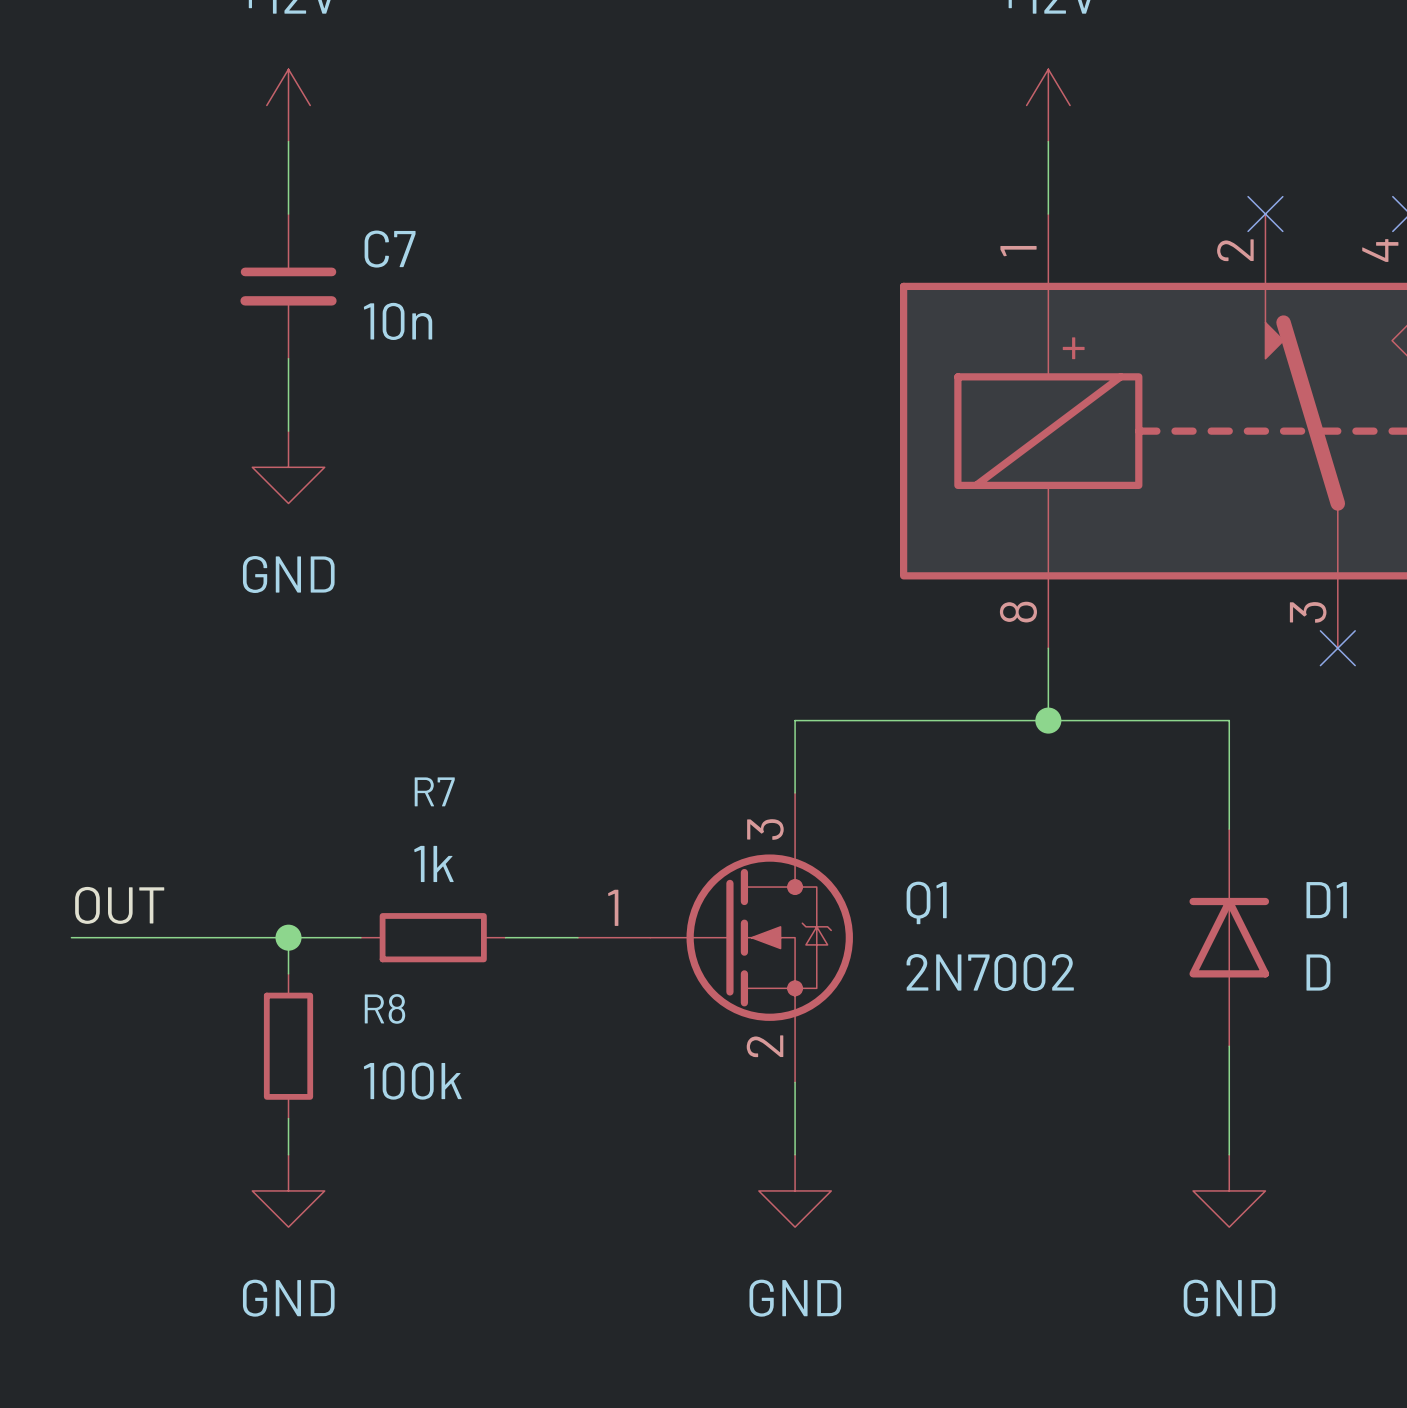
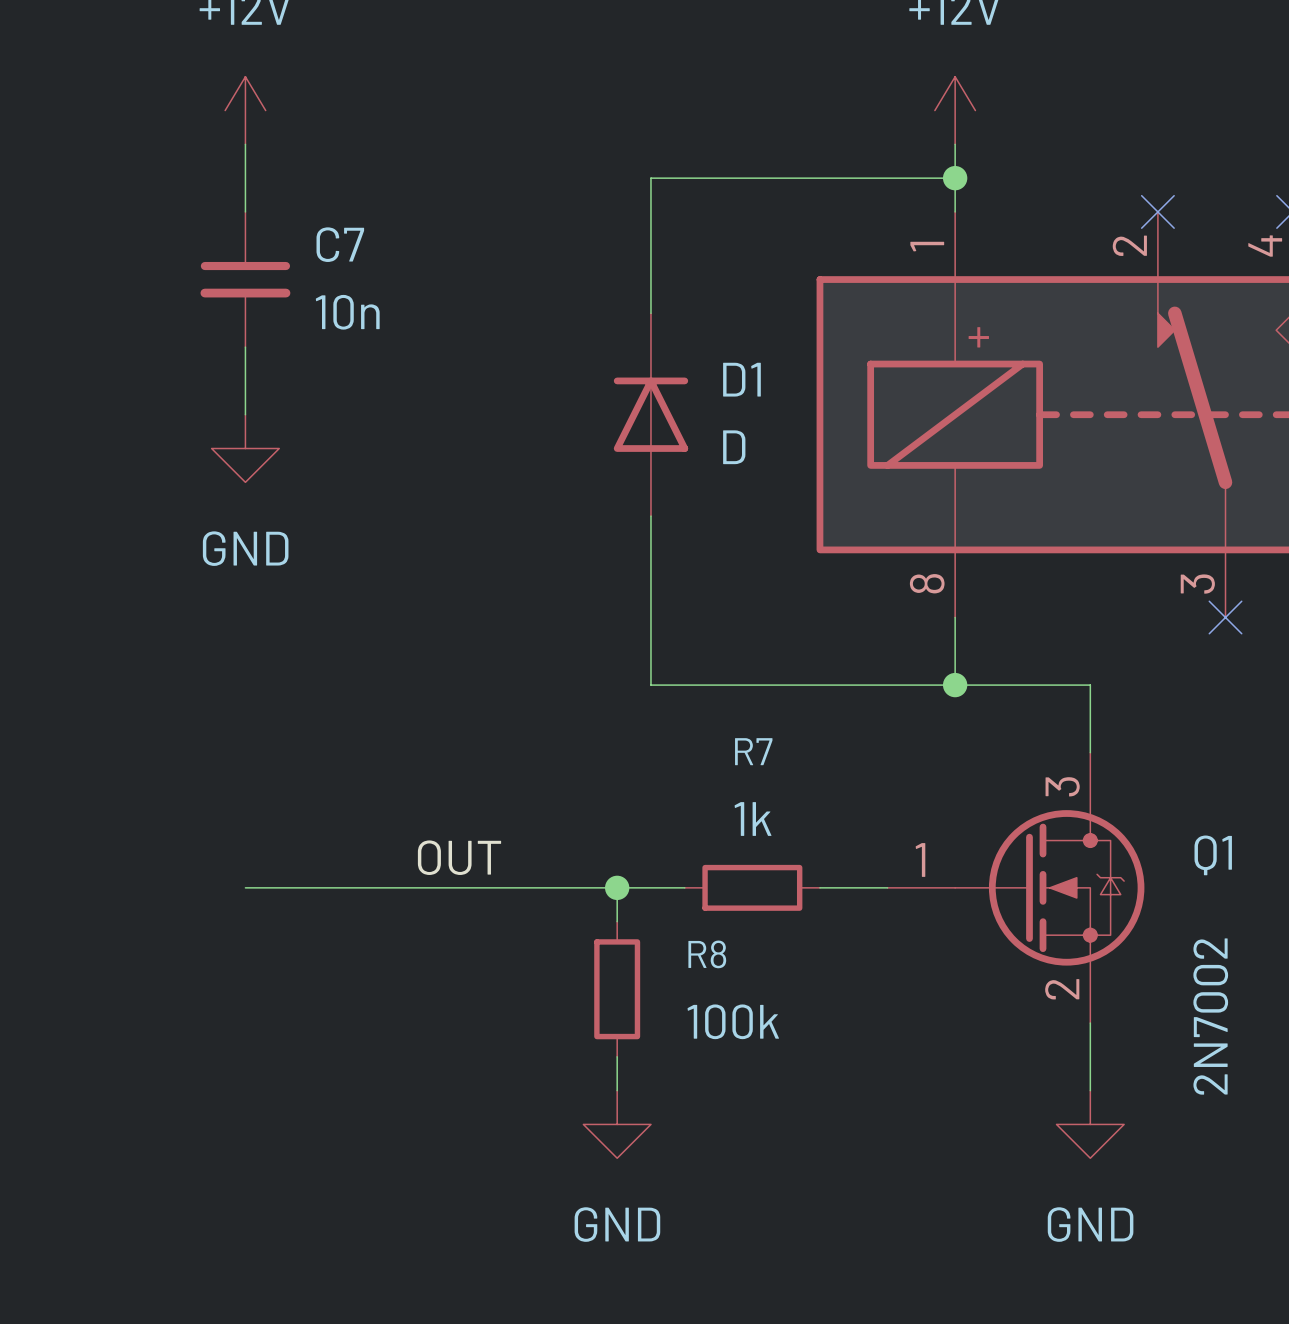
wire: none -> (955, 178) (650, 178) (650, 313)
junction: none -> (955, 178)
wire: (795, 720) (795, 792) -> (718, 685) (650, 685) (650, 516)
wire: (1193, 720) (1229, 720) (1229, 829) -> (1090, 685) (1090, 752)
label position: OUT (119, 905) -> OUT (459, 857)
wire: (71, 937) (288, 937) (288, 973) -> none
junction: (288, 937) -> none
wire: none -> (313, 887) (448, 887)
R7 position: (433, 937) -> (752, 887)
wire: none -> (617, 887) (617, 921)
junction: none -> (617, 887)
Q1 position: (715, 937) -> (1015, 887)
wire: none -> (819, 887) (887, 887)
D1 position: (1229, 937) -> (650, 414)
Q1 value rotation: 0° (990, 972) -> 90° counterclockwise (1210, 1016)
R8 position: (288, 1046) -> (617, 989)
wire: (1229, 1046) (1229, 1154) -> none
wire: (795, 1082) (795, 1154) -> (1090, 1023) (1090, 1090)
wire: (288, 1118) (288, 1154) -> (617, 1056) (617, 1090)
power symbol: GND (288, 1190) -> none
power symbol position: GND (795, 1190) -> GND (617, 1124)
power symbol position: GND (1229, 1190) -> GND (1090, 1124)

